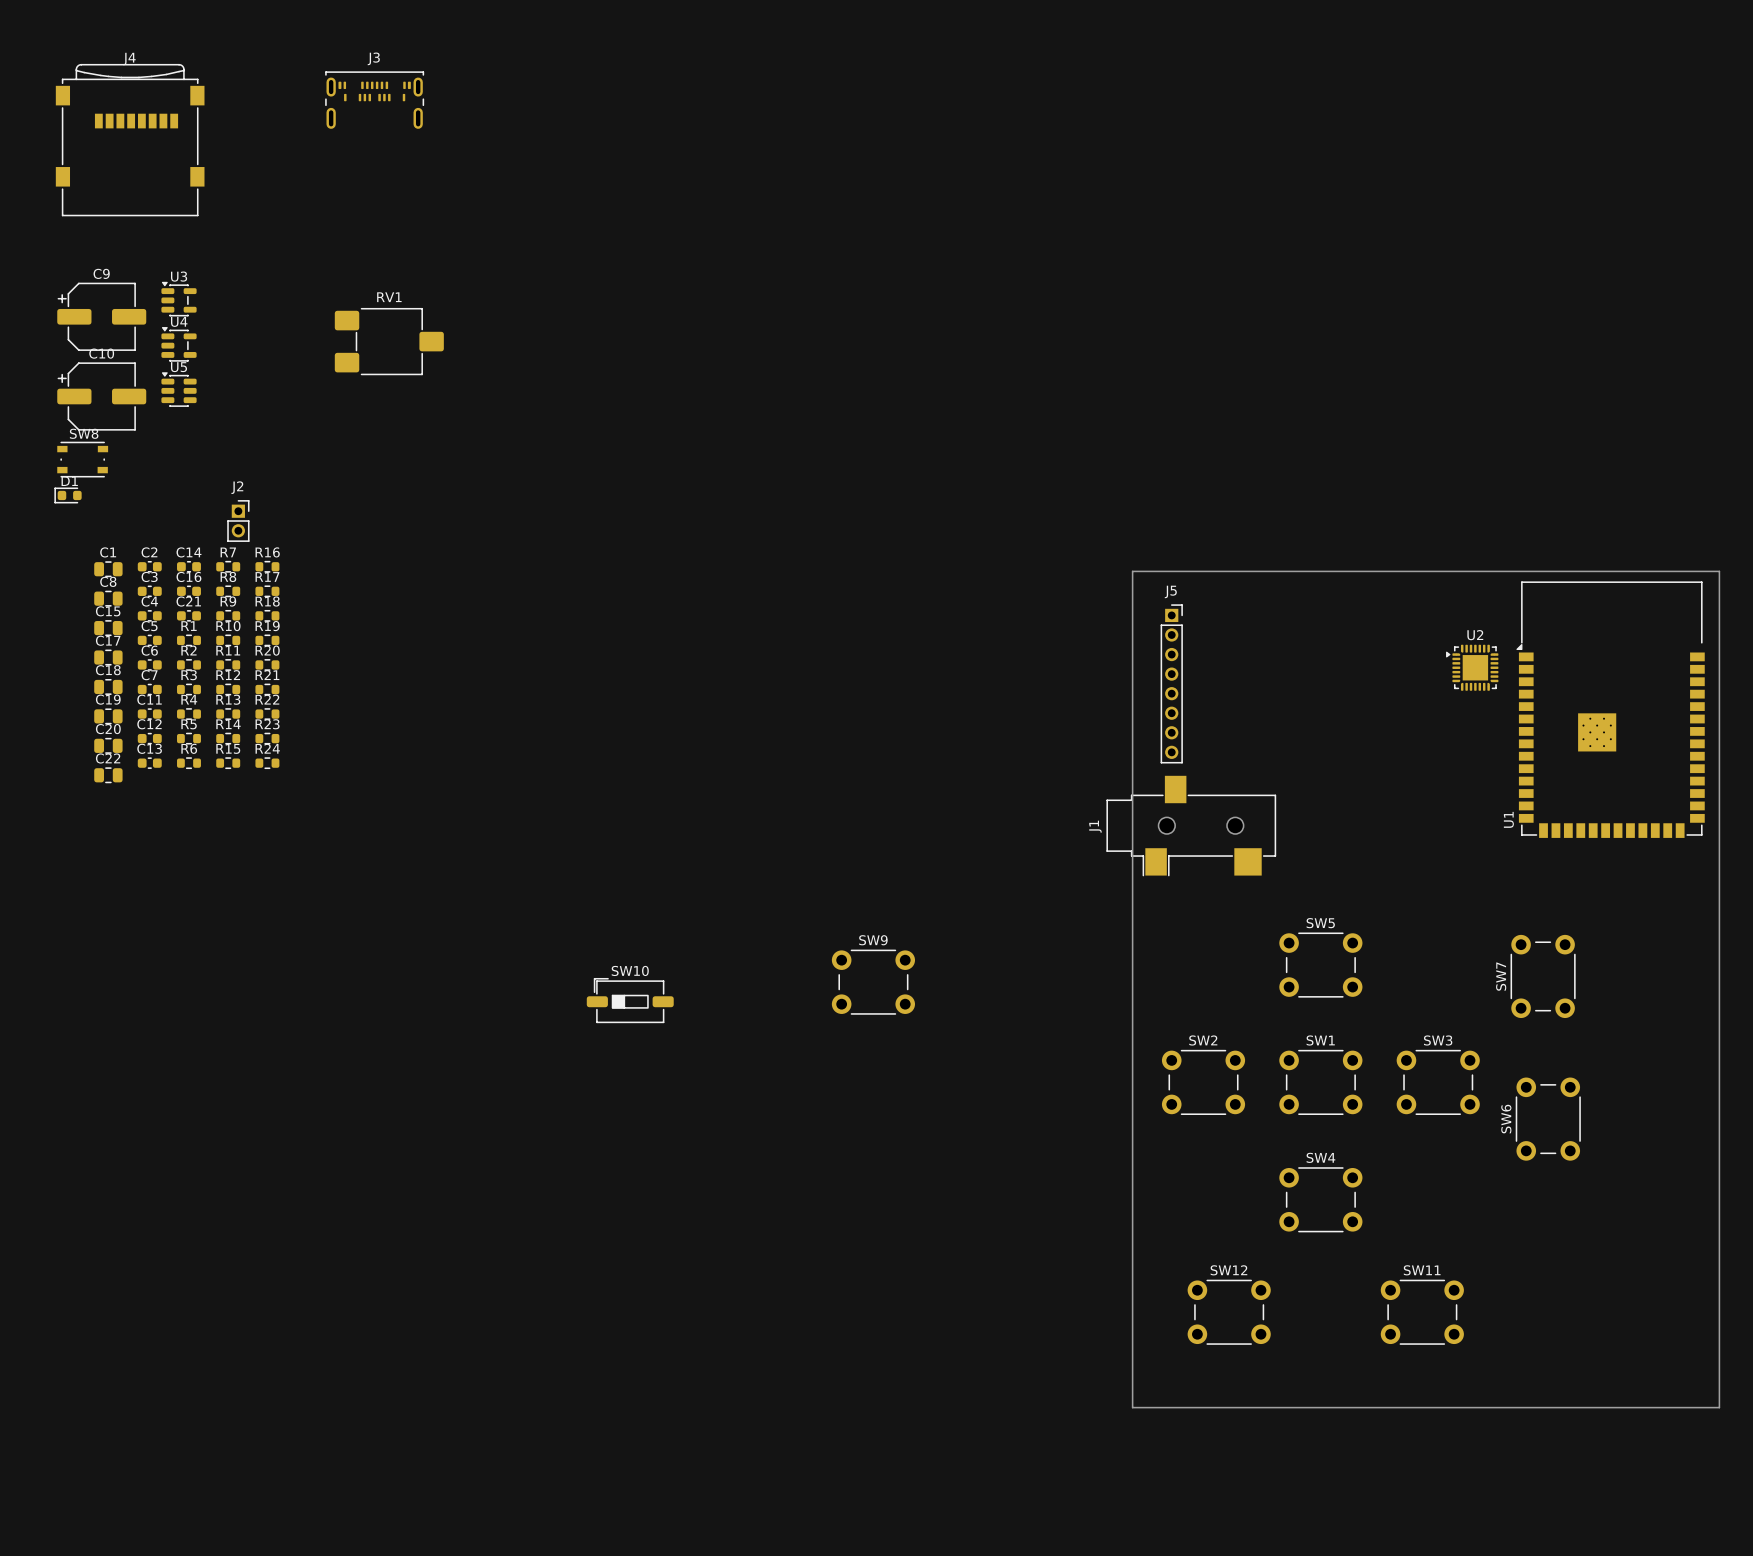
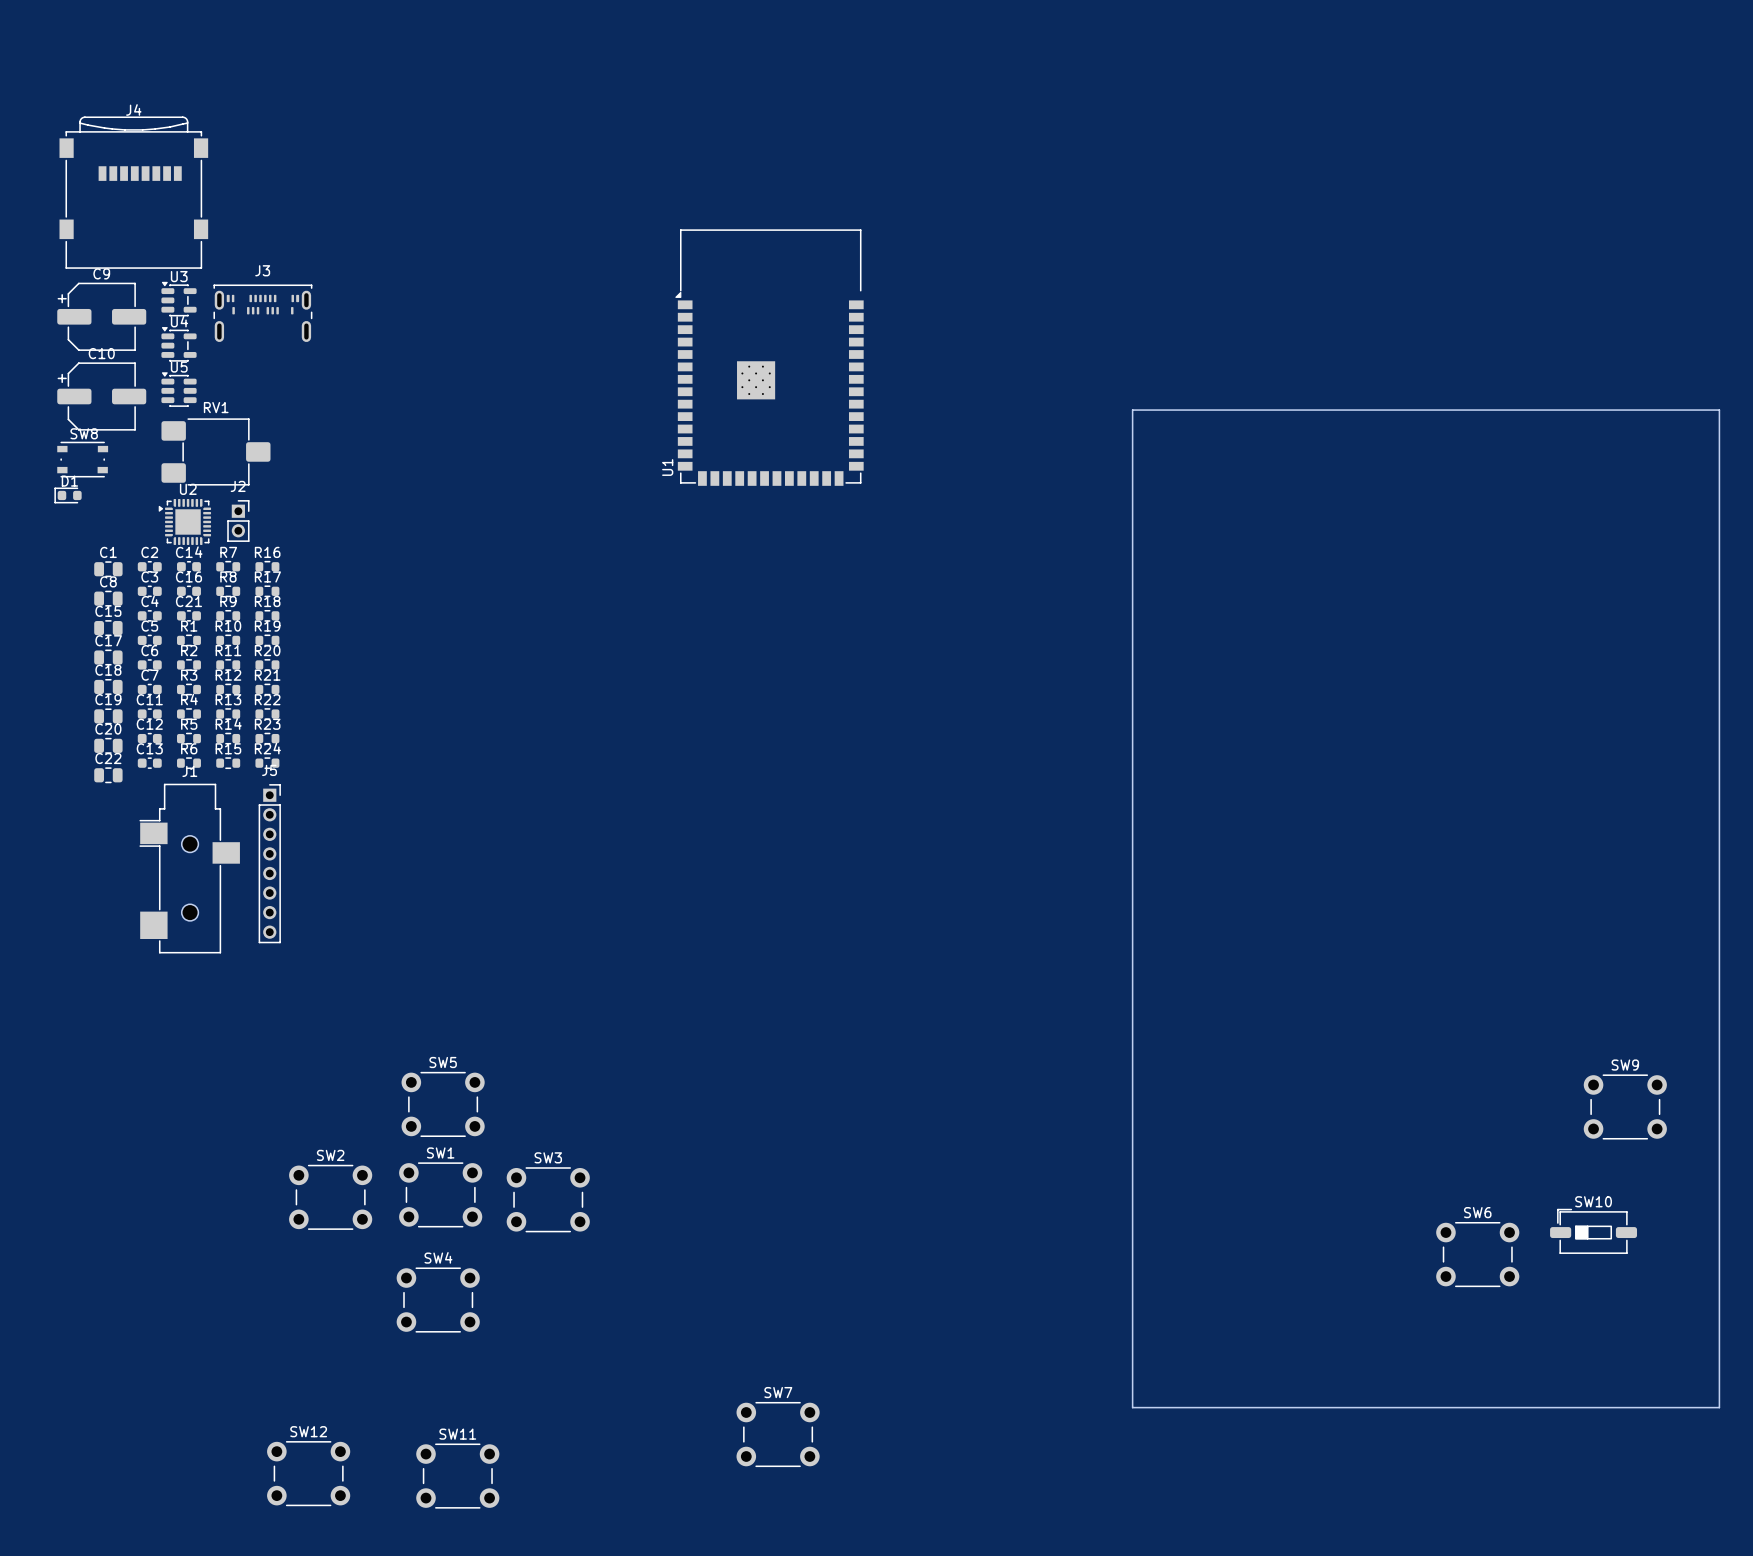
J3 position: (374, 100) -> (262, 313)
J4 position: (130, 140) -> (133, 192)
RV1 position: (389, 341) -> (215, 451)
board edge: (1132, 571) (1719, 571) -> (1132, 571) (1132, 410) (1719, 410) (1719, 571)
U2 position: (1472, 667) -> (184, 521)
J5 position: (1171, 683) -> (269, 863)
U1 position: (1610, 709) -> (769, 357)
J1 rotation: 0° (1191, 825) -> 90° clockwise (189, 868)
J1 position: (1191, 825) -> (189, 868)
SW5 position: (1320, 965) -> (443, 1104)
SW7 rotation: 0° (1543, 976) -> 90° clockwise (778, 1434)
SW7 position: (1543, 976) -> (778, 1434)
SW9 position: (873, 982) -> (1625, 1106)
SW10 position: (630, 1000) -> (1593, 1231)
SW2 position: (1203, 1082) -> (330, 1197)
SW1 position: (1320, 1082) -> (440, 1194)
SW3 position: (1438, 1082) -> (548, 1199)
SW6 rotation: 0° (1548, 1119) -> 90° clockwise (1477, 1254)
SW6 position: (1548, 1119) -> (1477, 1254)
SW4 position: (1320, 1199) -> (438, 1300)
SW12 position: (1229, 1312) -> (308, 1473)
SW11 position: (1422, 1312) -> (457, 1476)

